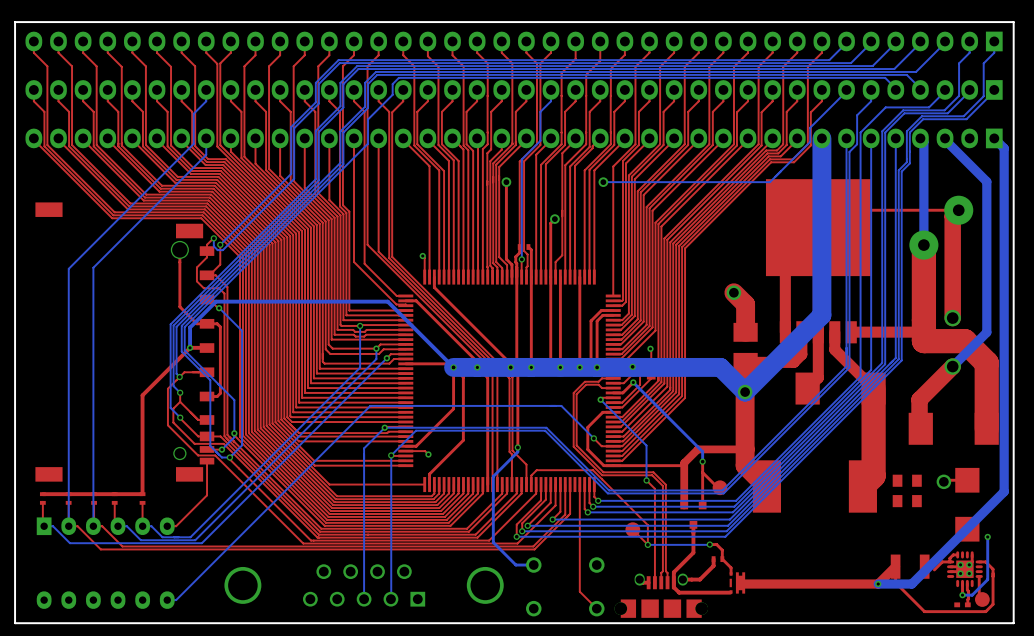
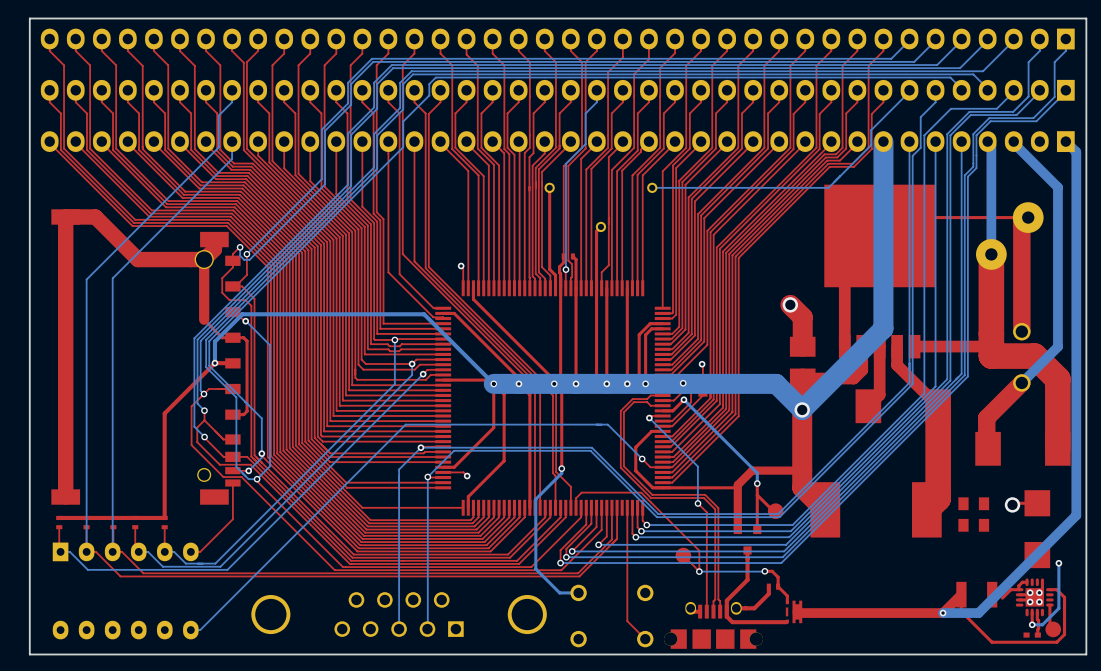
top track: none -> (214, 239) (214, 249) (204, 259) (138, 259) (95, 216) (65, 216) (65, 497)
top track width: thin (179, 249) (179, 306) -> thick (204, 259) (204, 319)

